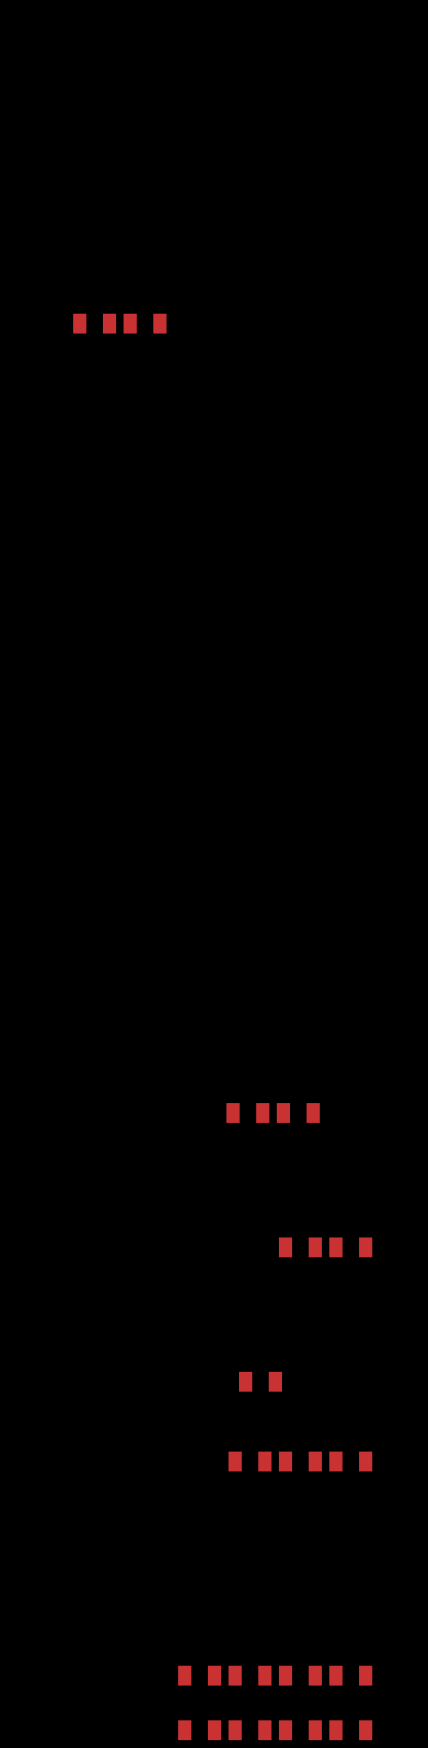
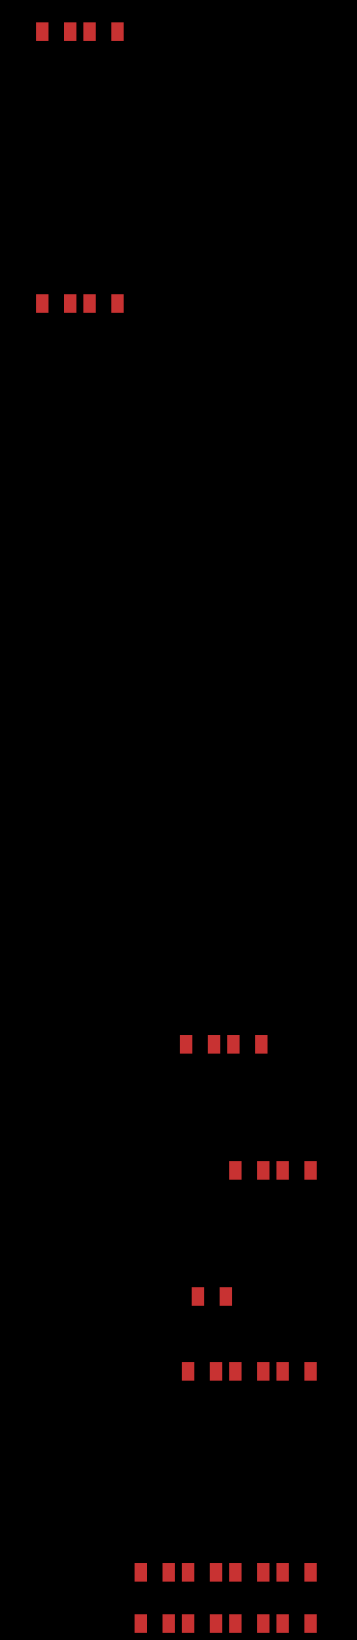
part: none -> (56, 31)
part: none -> (103, 31)

